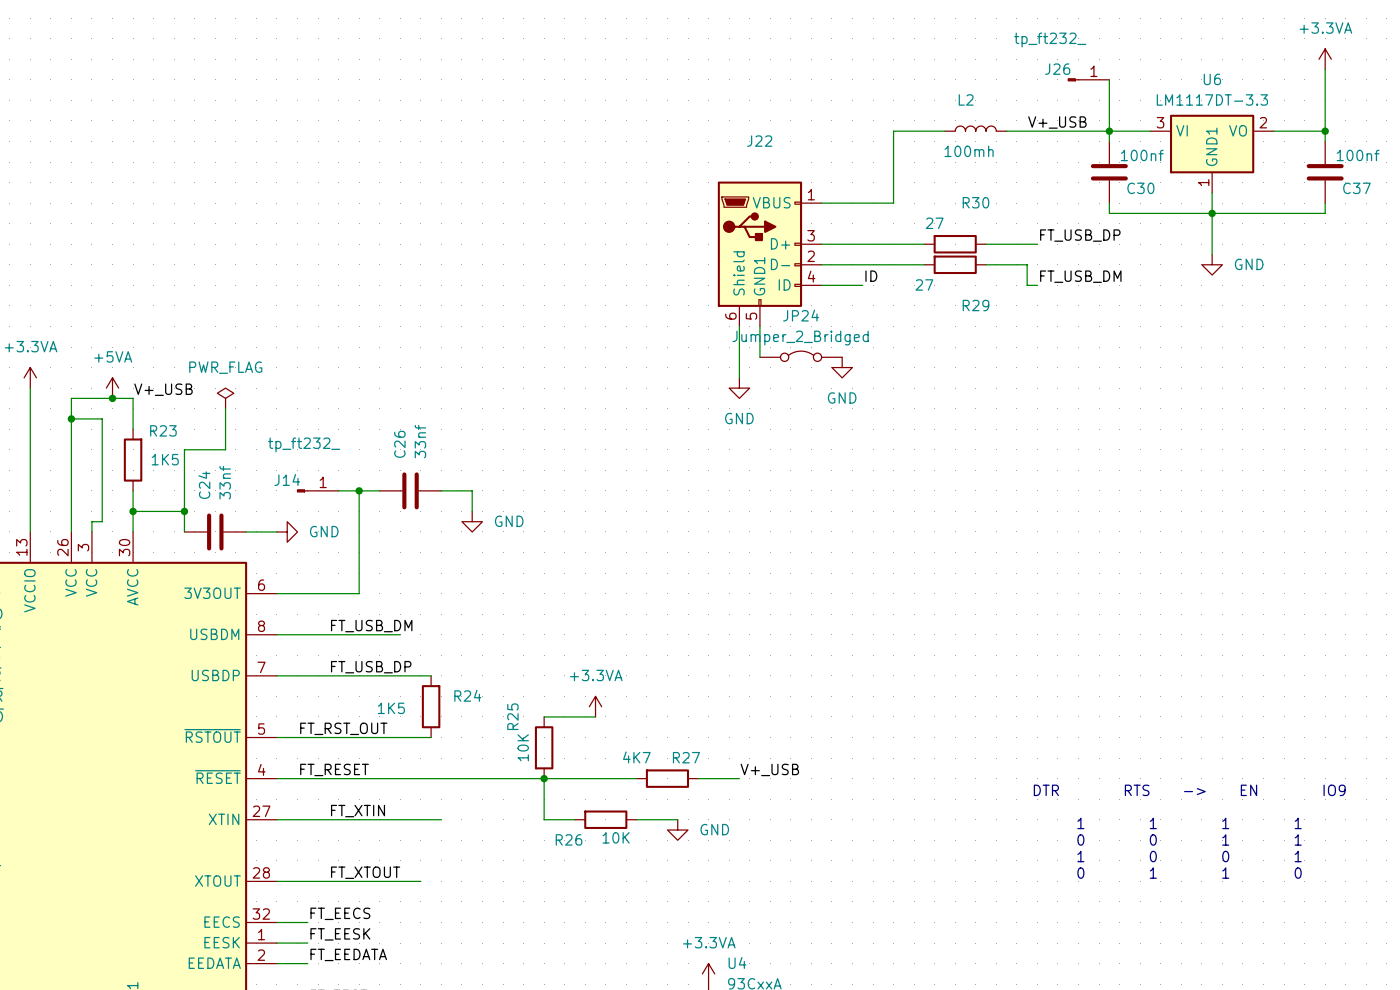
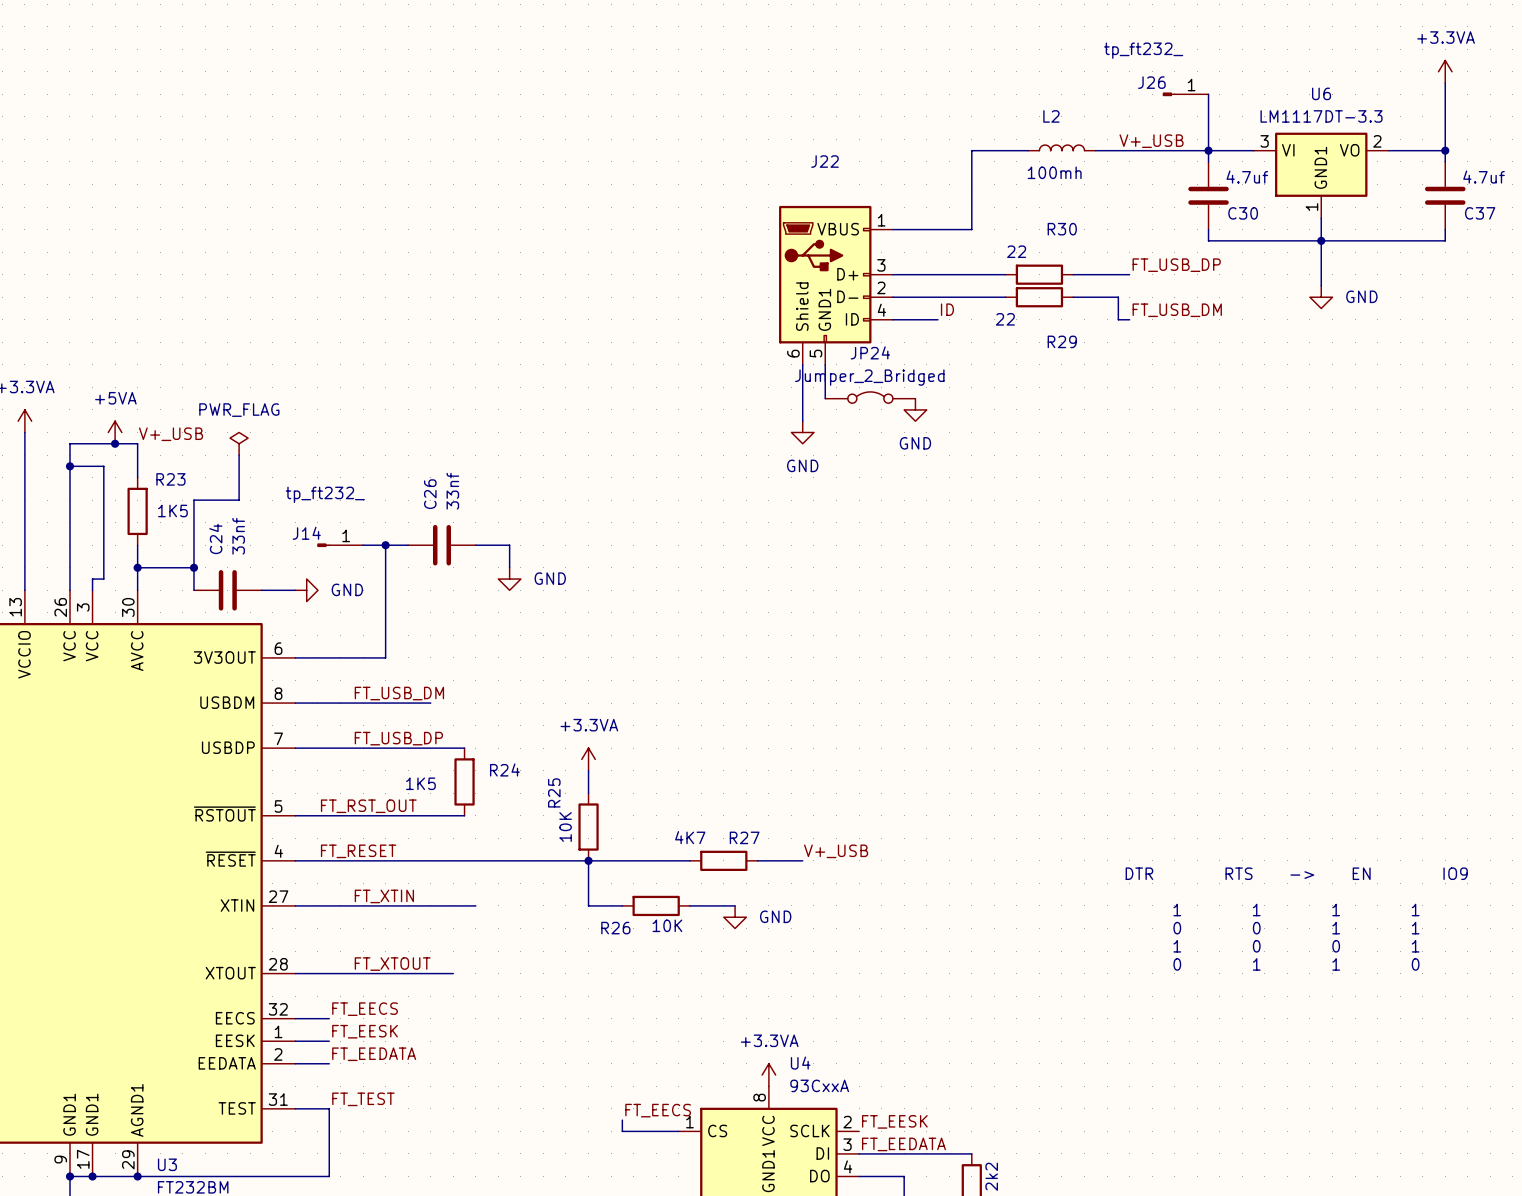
C30 value: 100nf (1142, 155) -> 4.7uf (1247, 177)
C37 value: 100nf (1358, 155) -> 4.7uf (1484, 177)
R29 value: 27 (934, 223) -> 22 (1016, 251)
R30 value: 27 (924, 284) -> 22 (1005, 319)
power symbol position: +3.3VA (595, 706) -> +3.3VA (588, 759)
wire: (544, 716) (595, 716) -> (588, 793) (588, 770)

